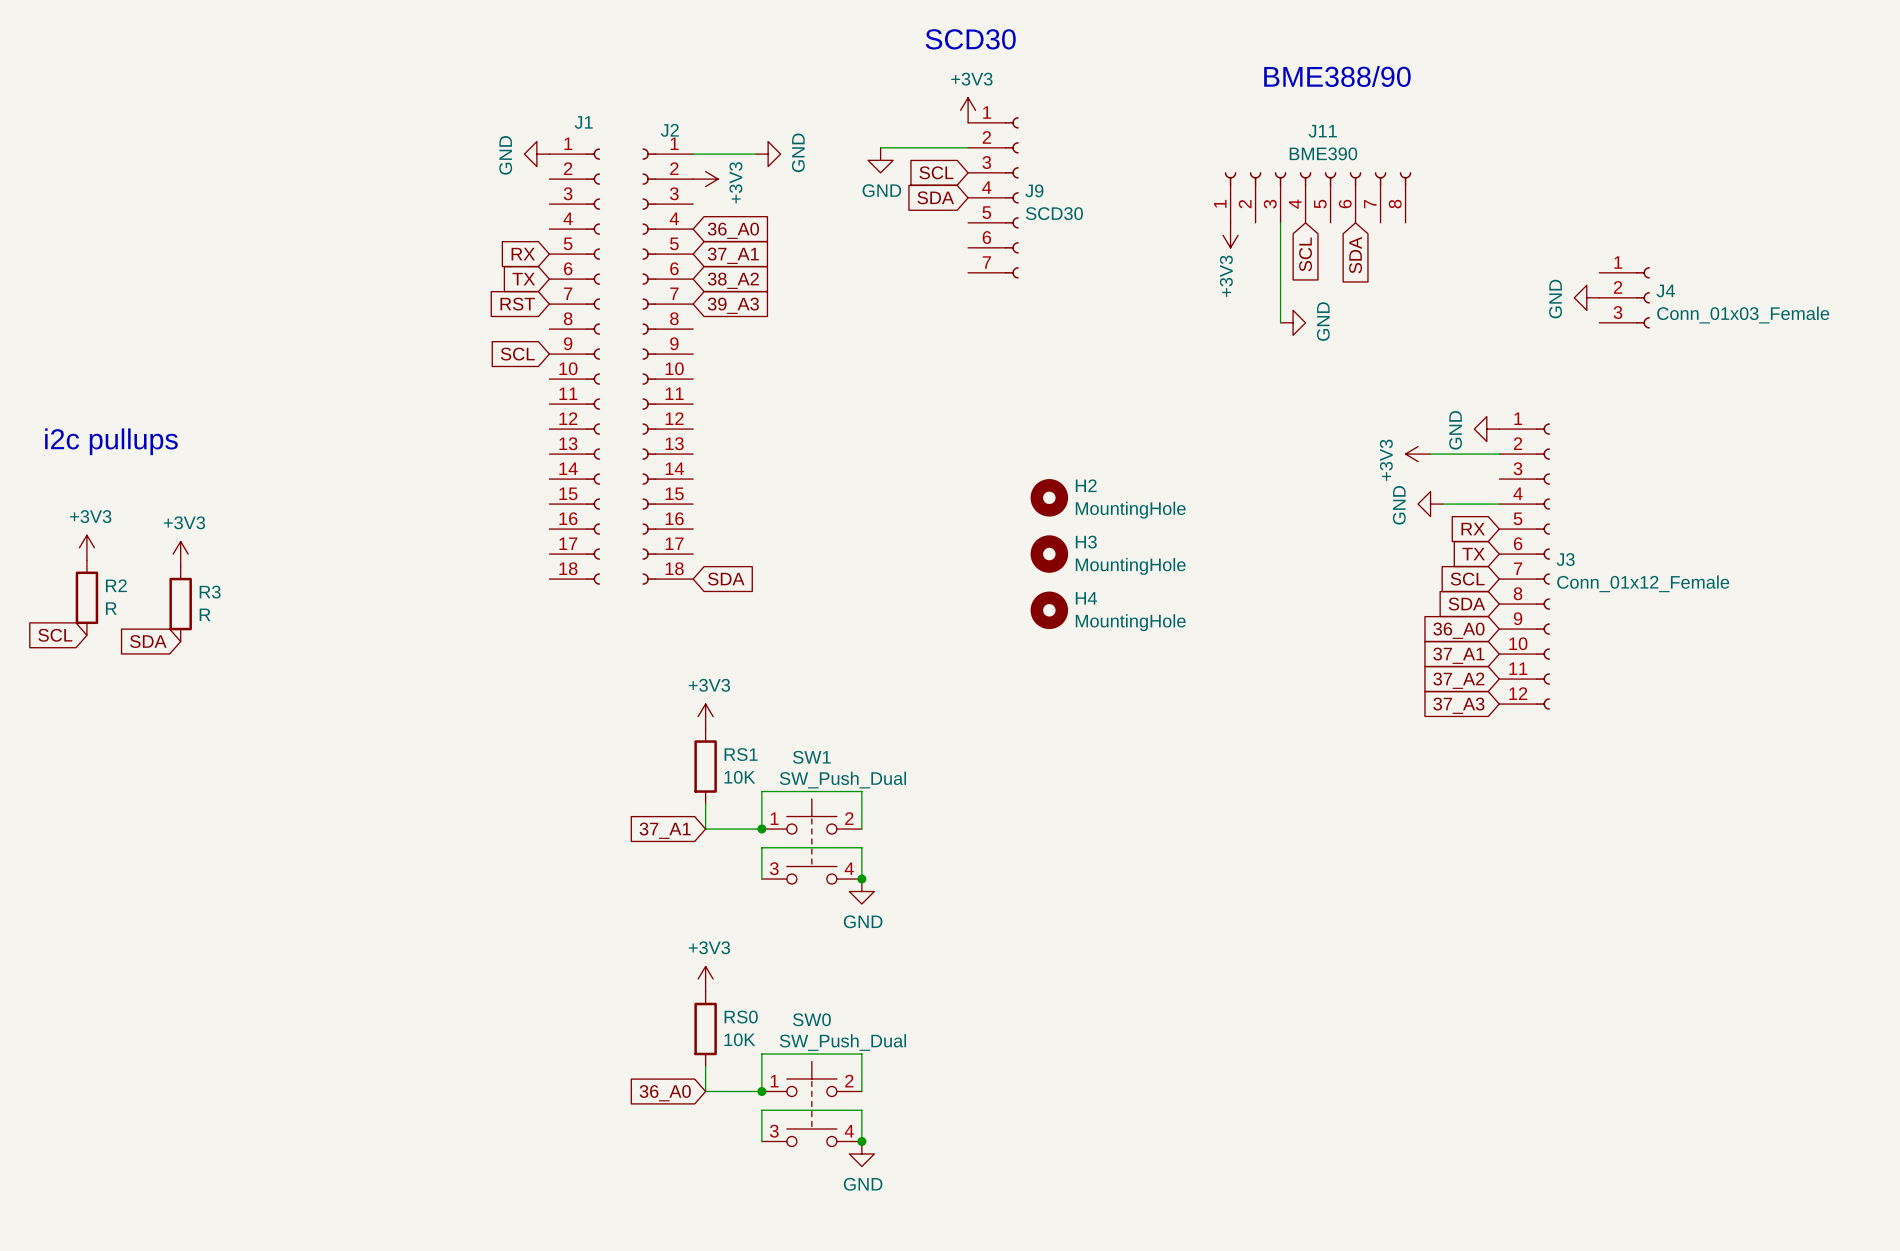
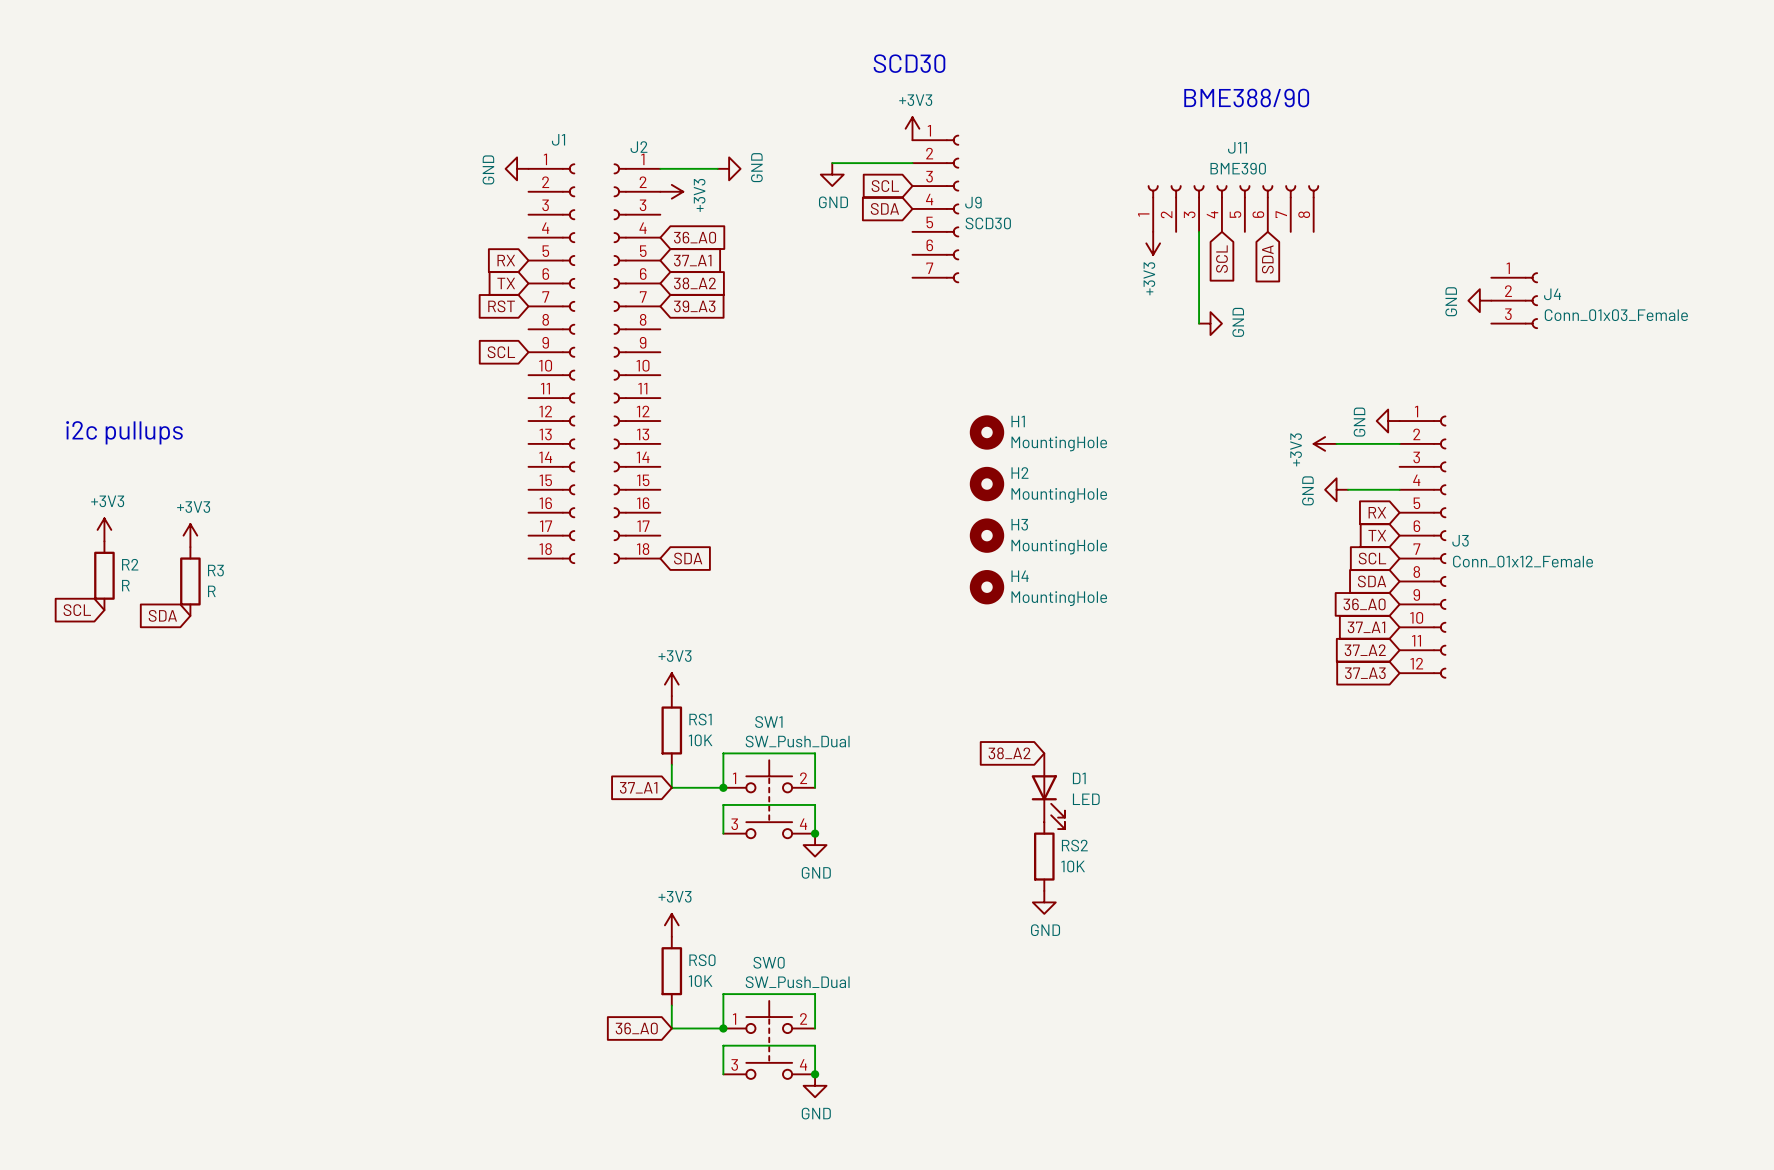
H1: none -> MountingHole (987, 432)
global label: none -> 38_A2 (1009, 753)
D1: none -> LED (1048, 791)
RS2: none -> 10K (1044, 856)
power symbol: none -> GND (1044, 902)

